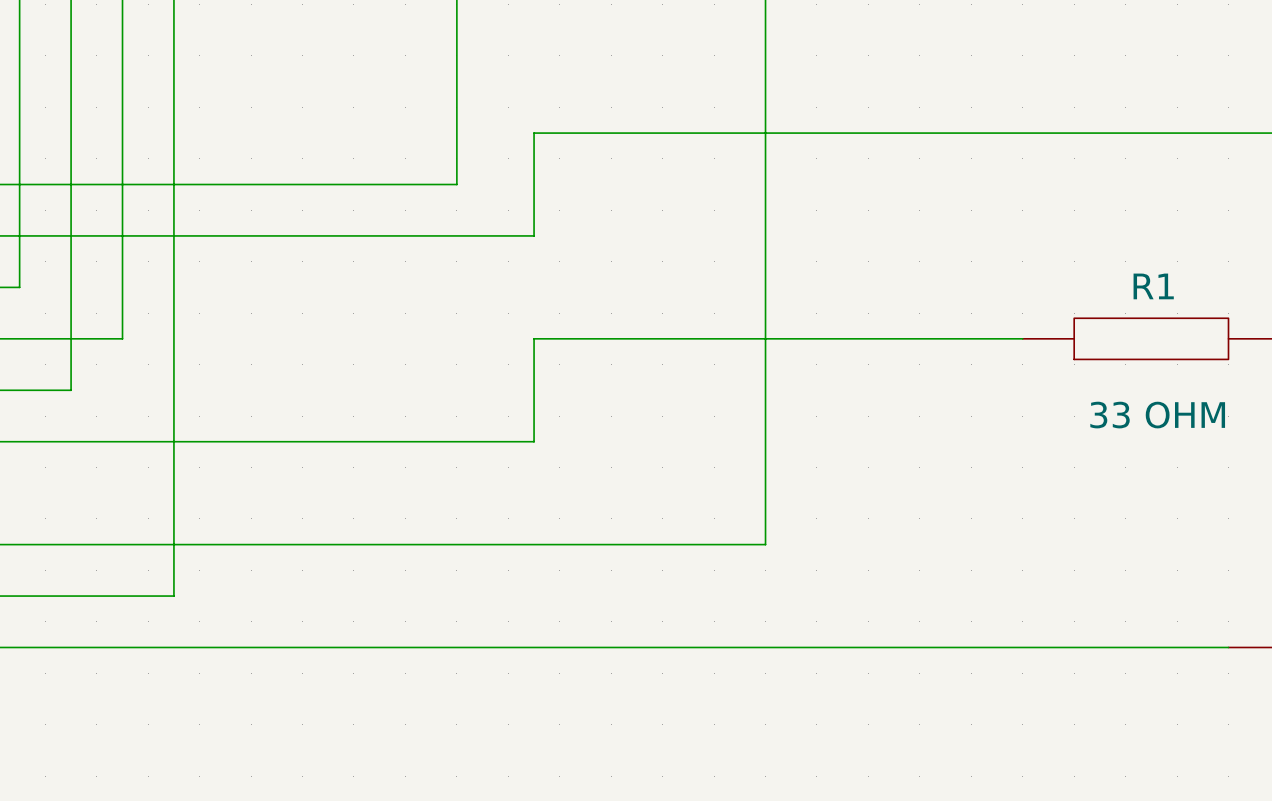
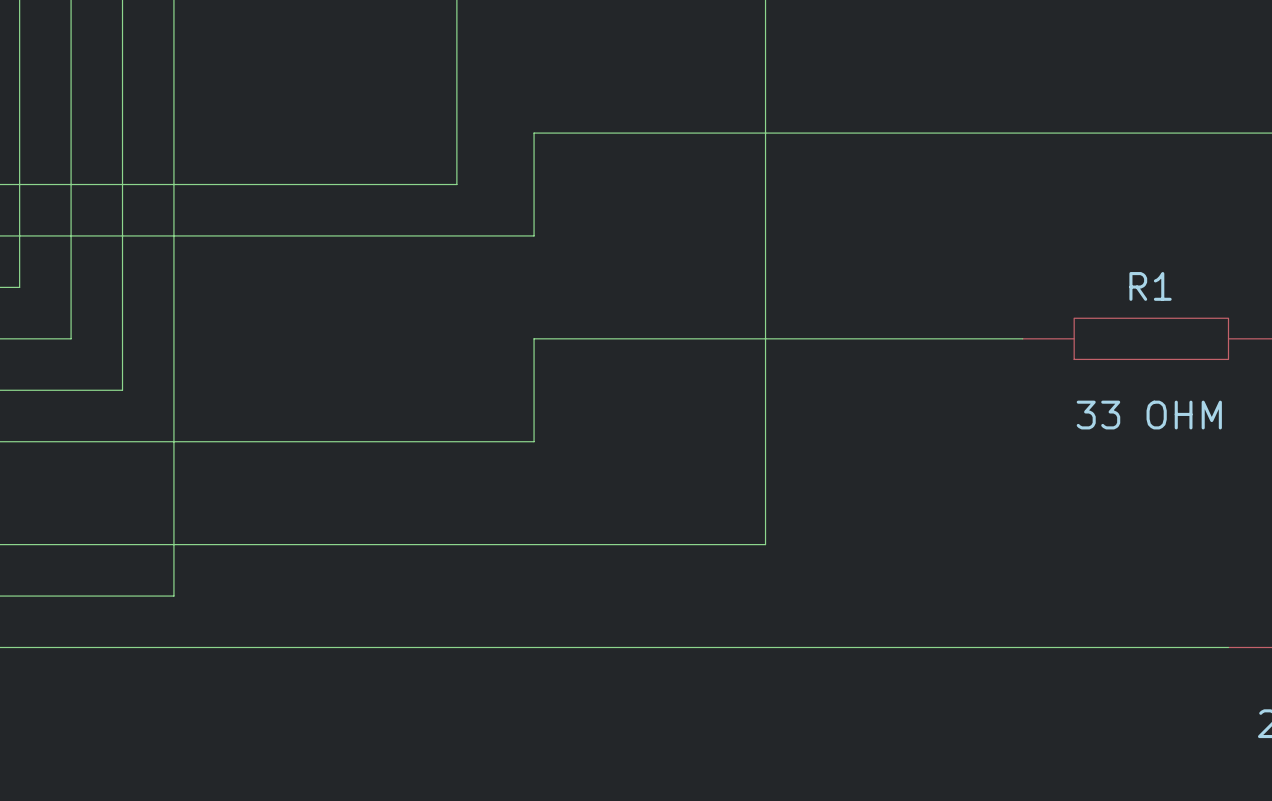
wire: (122, 338) (71, 338) (71, 390) -> (122, 338) (122, 390) (71, 390)

